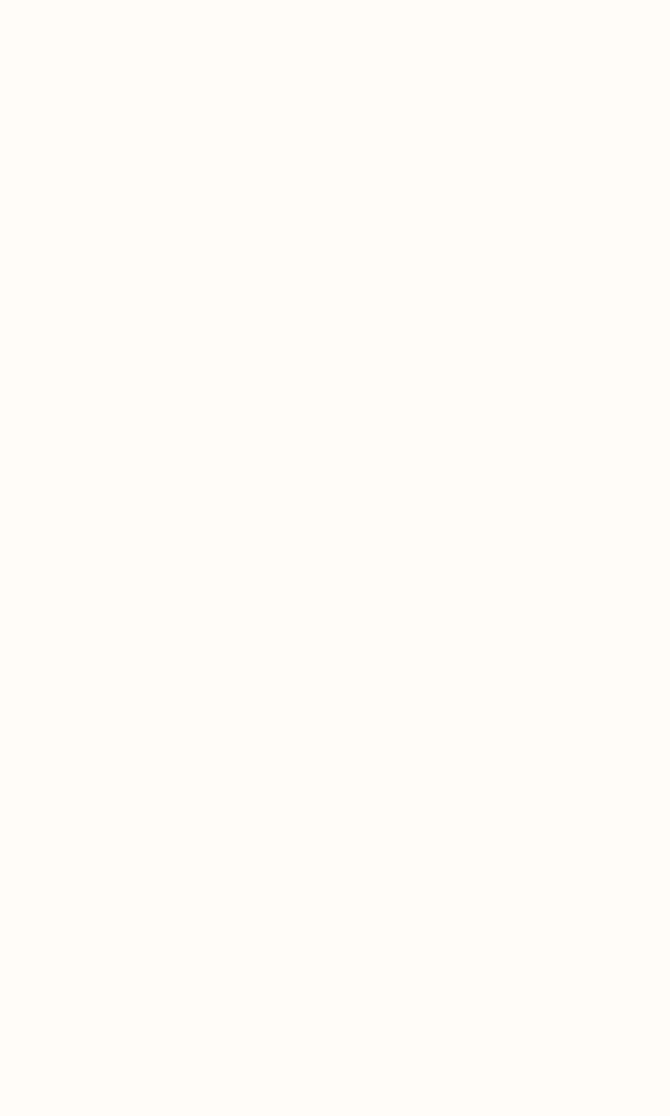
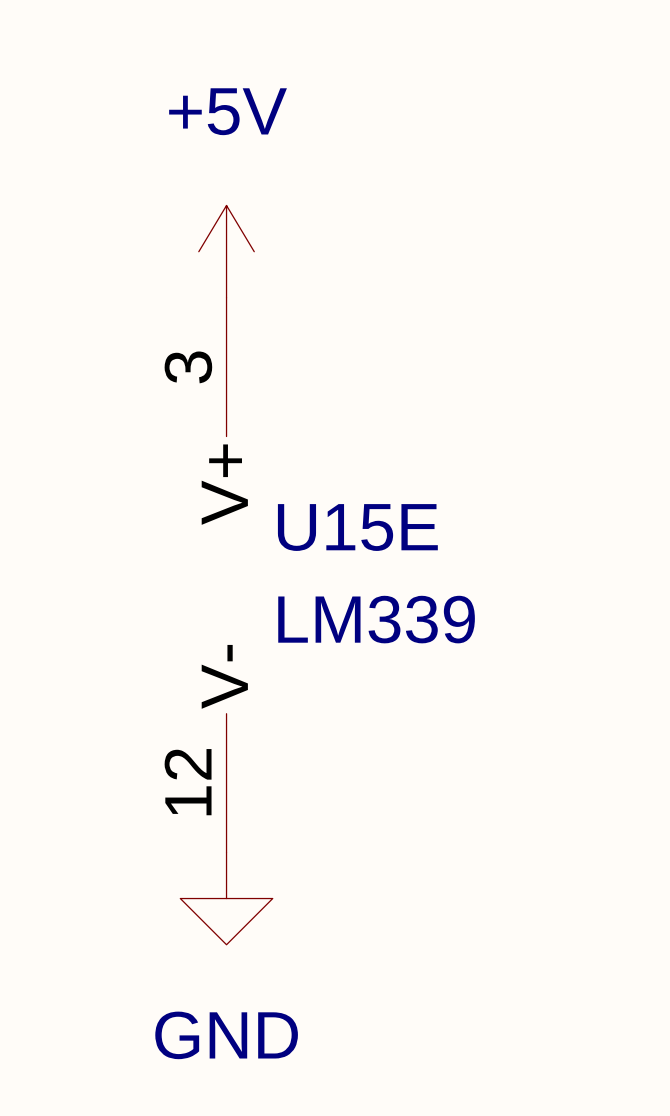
power symbol: none -> +5V (226, 251)
U15E: none -> LM339 (226, 575)
power symbol: none -> GND (226, 898)

